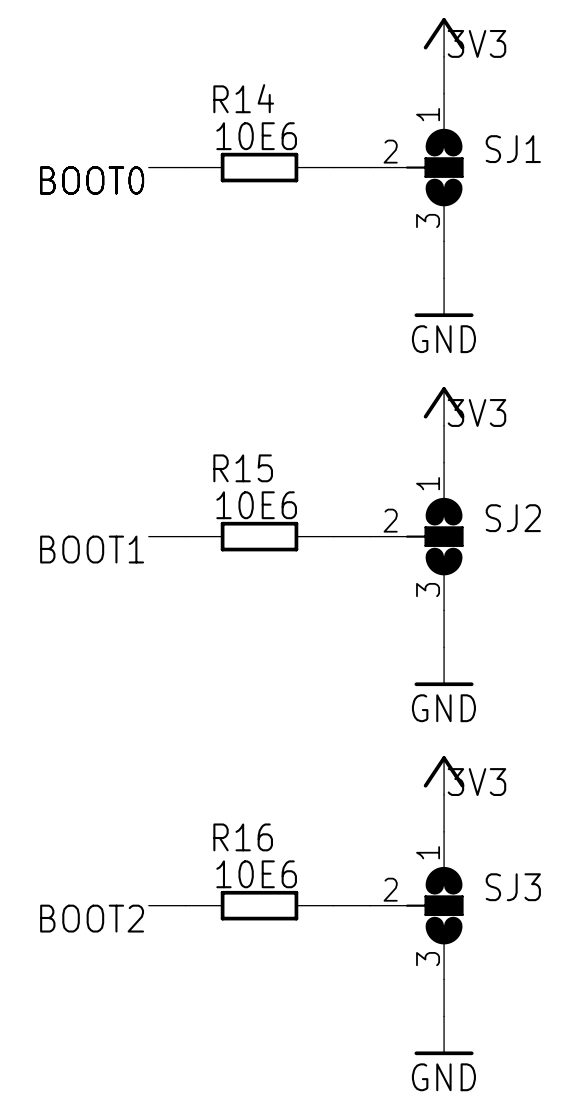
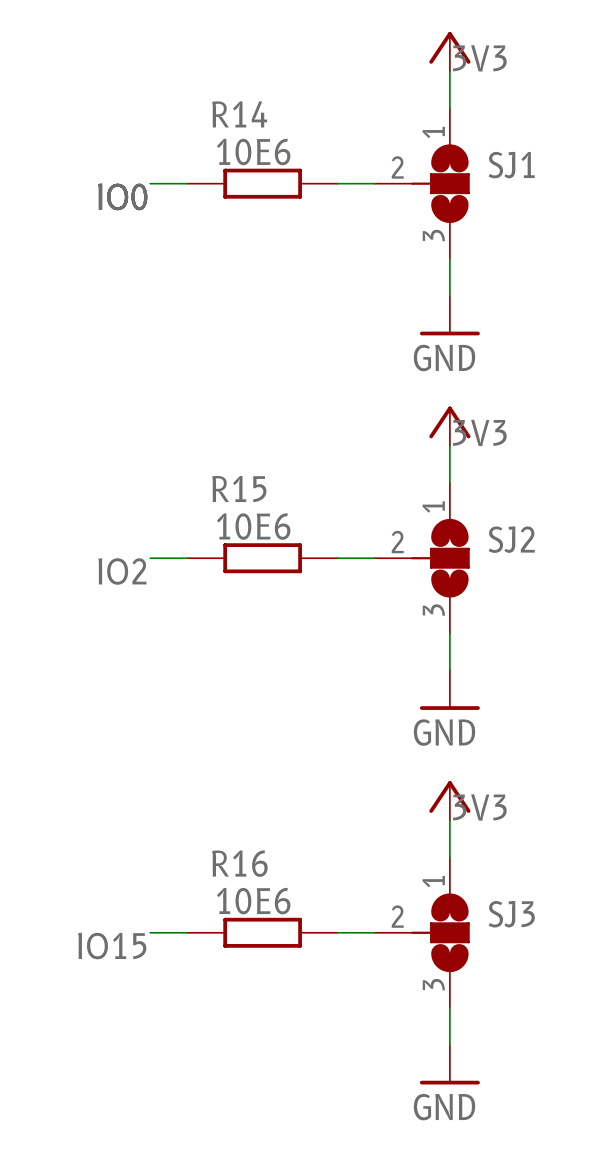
label: BOOT0 (92, 180) -> IO0 (122, 196)
label: BOOT1 (92, 549) -> IO2 (122, 571)
label: BOOT2 (92, 918) -> IO15 (112, 946)

